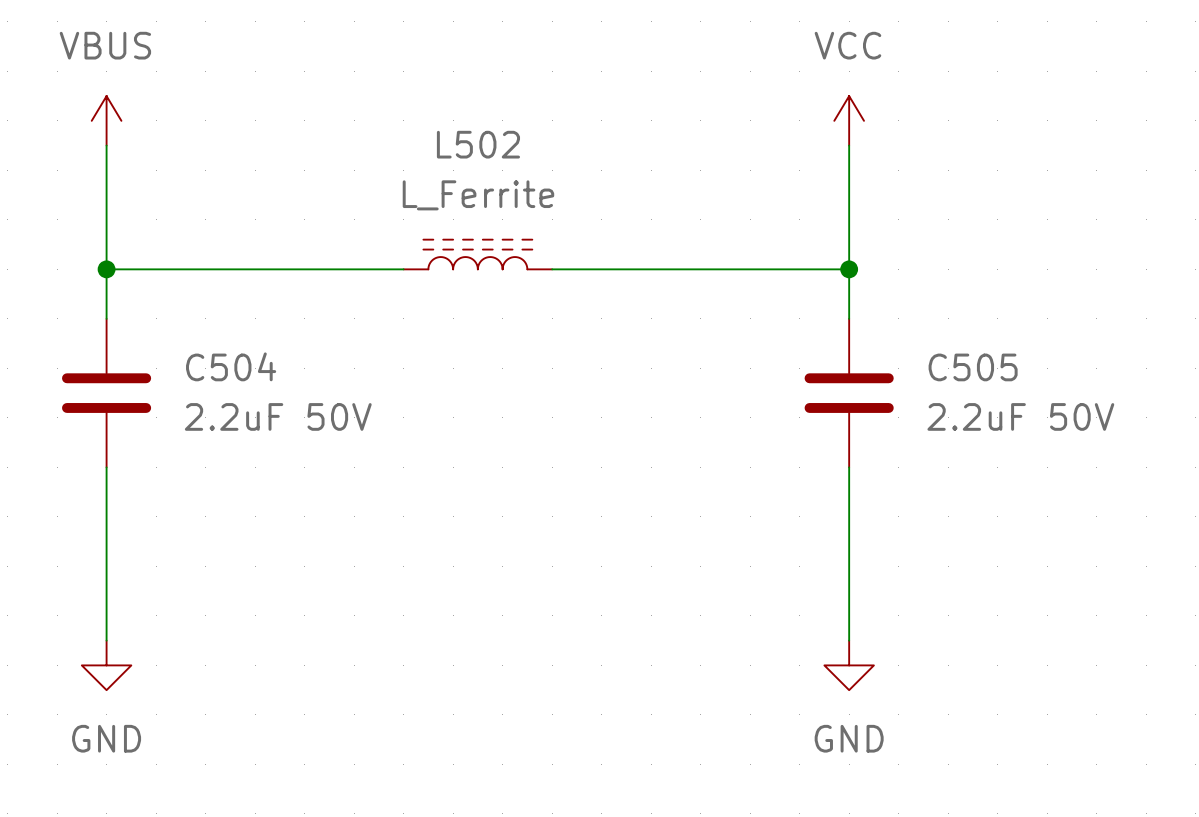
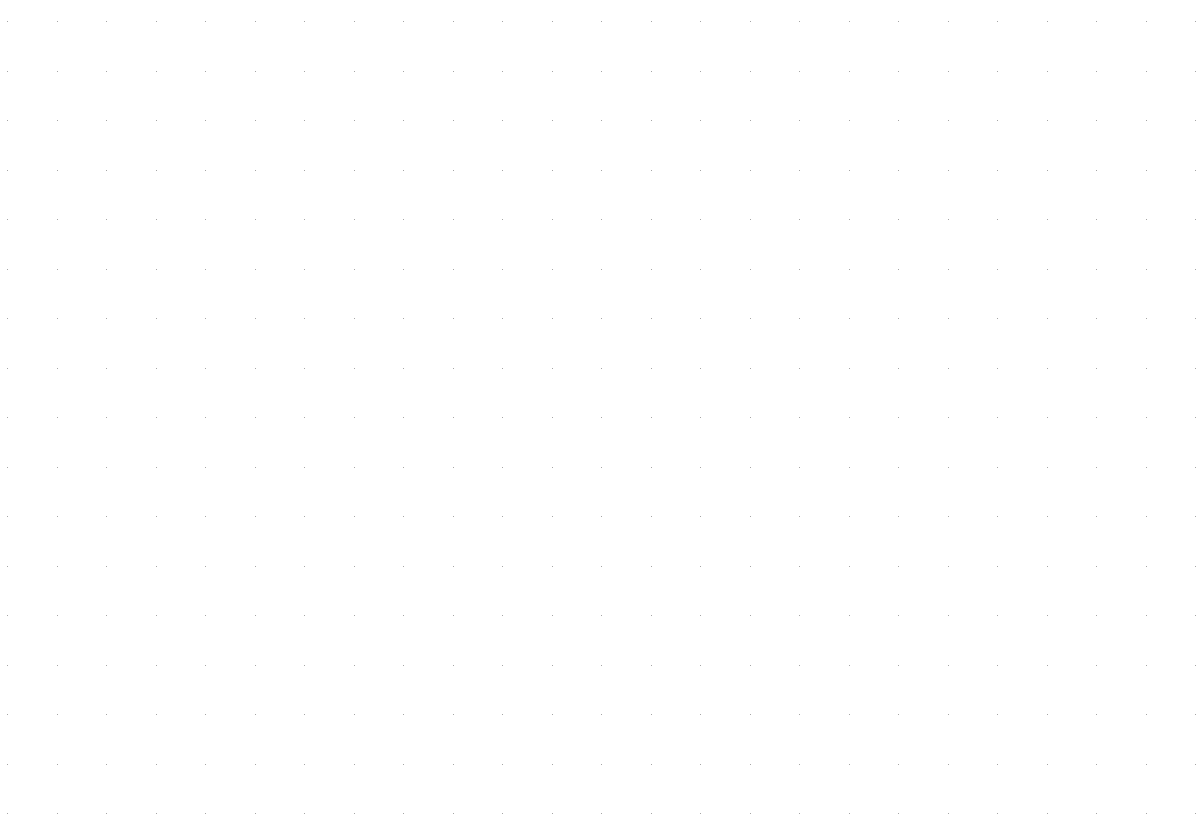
power symbol: VBUS (106, 120) -> none
power symbol: VCC (849, 120) -> none
wire: (106, 145) (106, 318) -> none
wire: (849, 145) (849, 318) -> none
L502: L_Ferrite (477, 254) -> none
wire: (106, 269) (403, 269) -> none
junction: (106, 269) -> none
wire: (552, 269) (849, 269) -> none
junction: (849, 269) -> none
C504: 2.2uF 50V (106, 393) -> none
C505: 2.2uF 50V (849, 393) -> none
wire: (106, 467) (106, 640) -> none
wire: (849, 467) (849, 640) -> none
power symbol: GND (106, 665) -> none
power symbol: GND (849, 665) -> none

